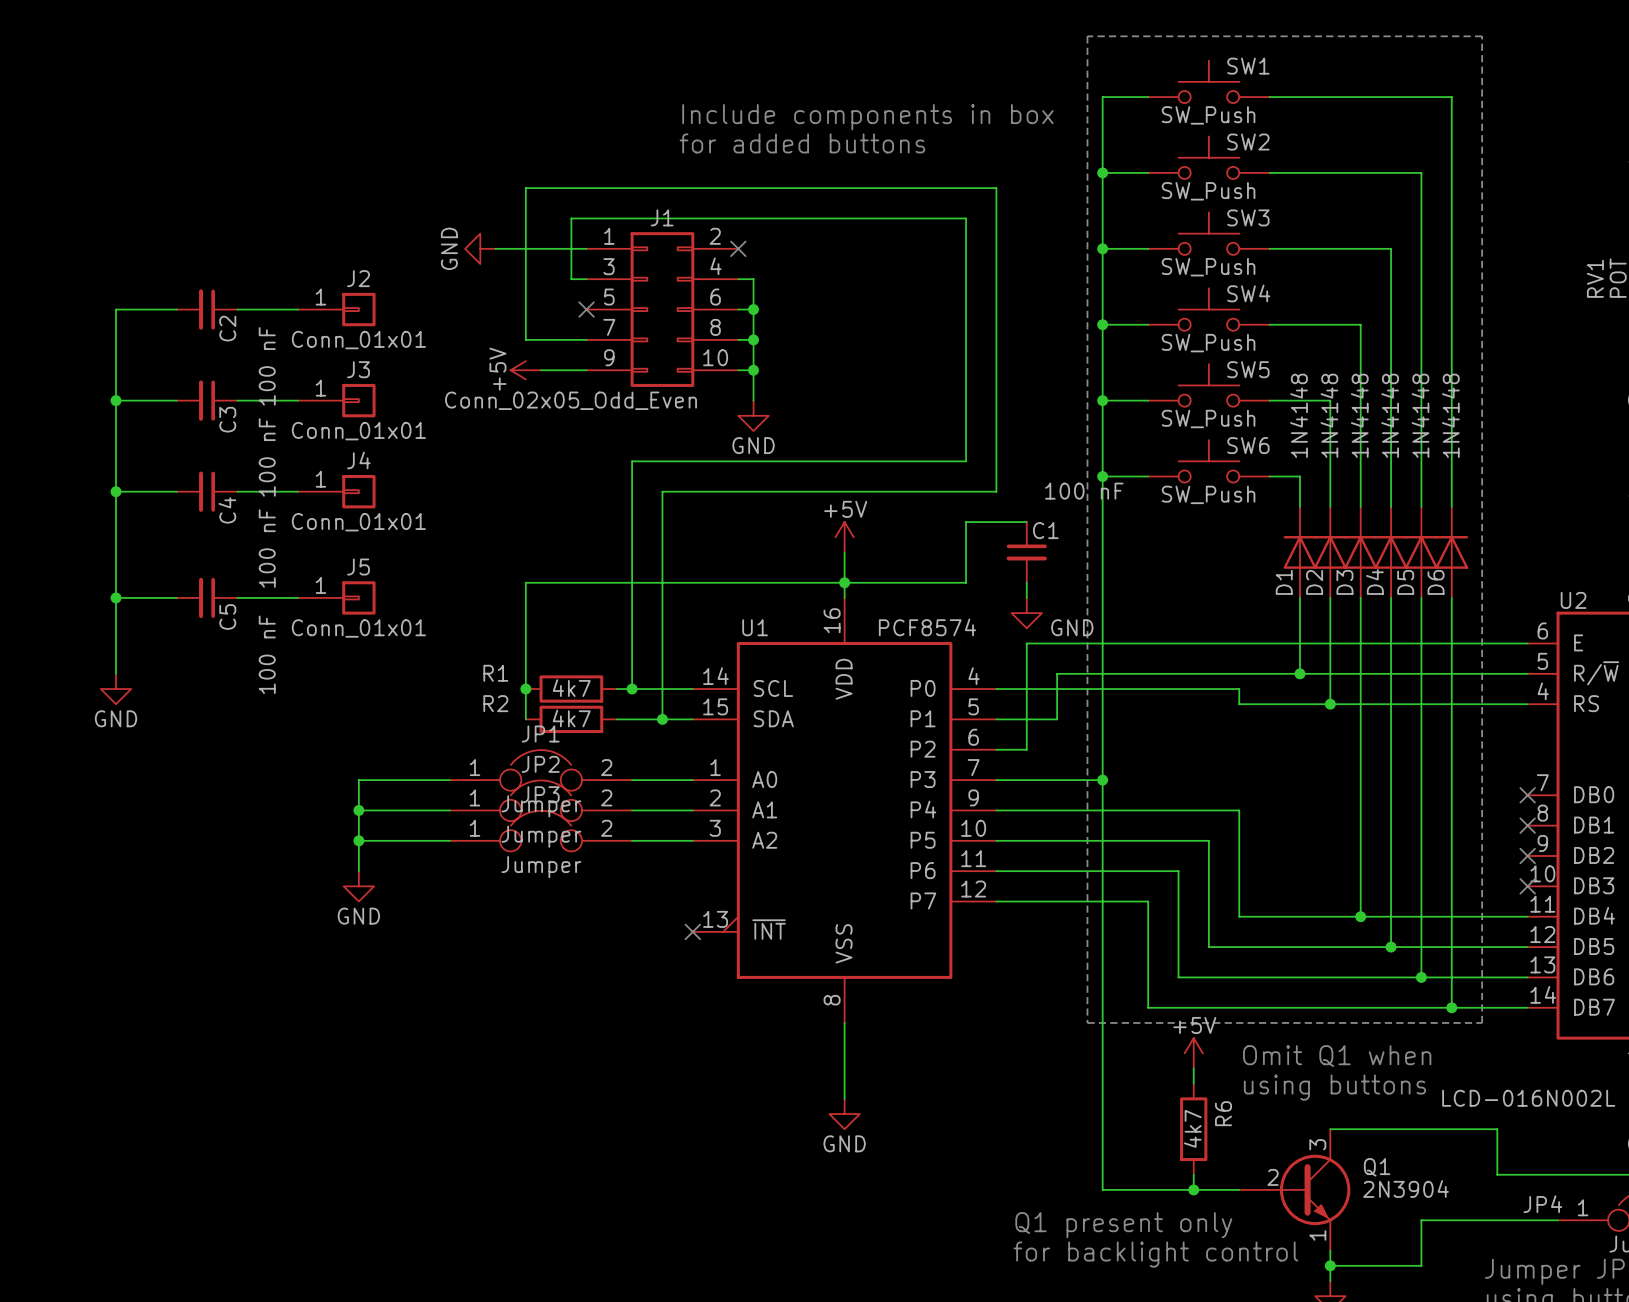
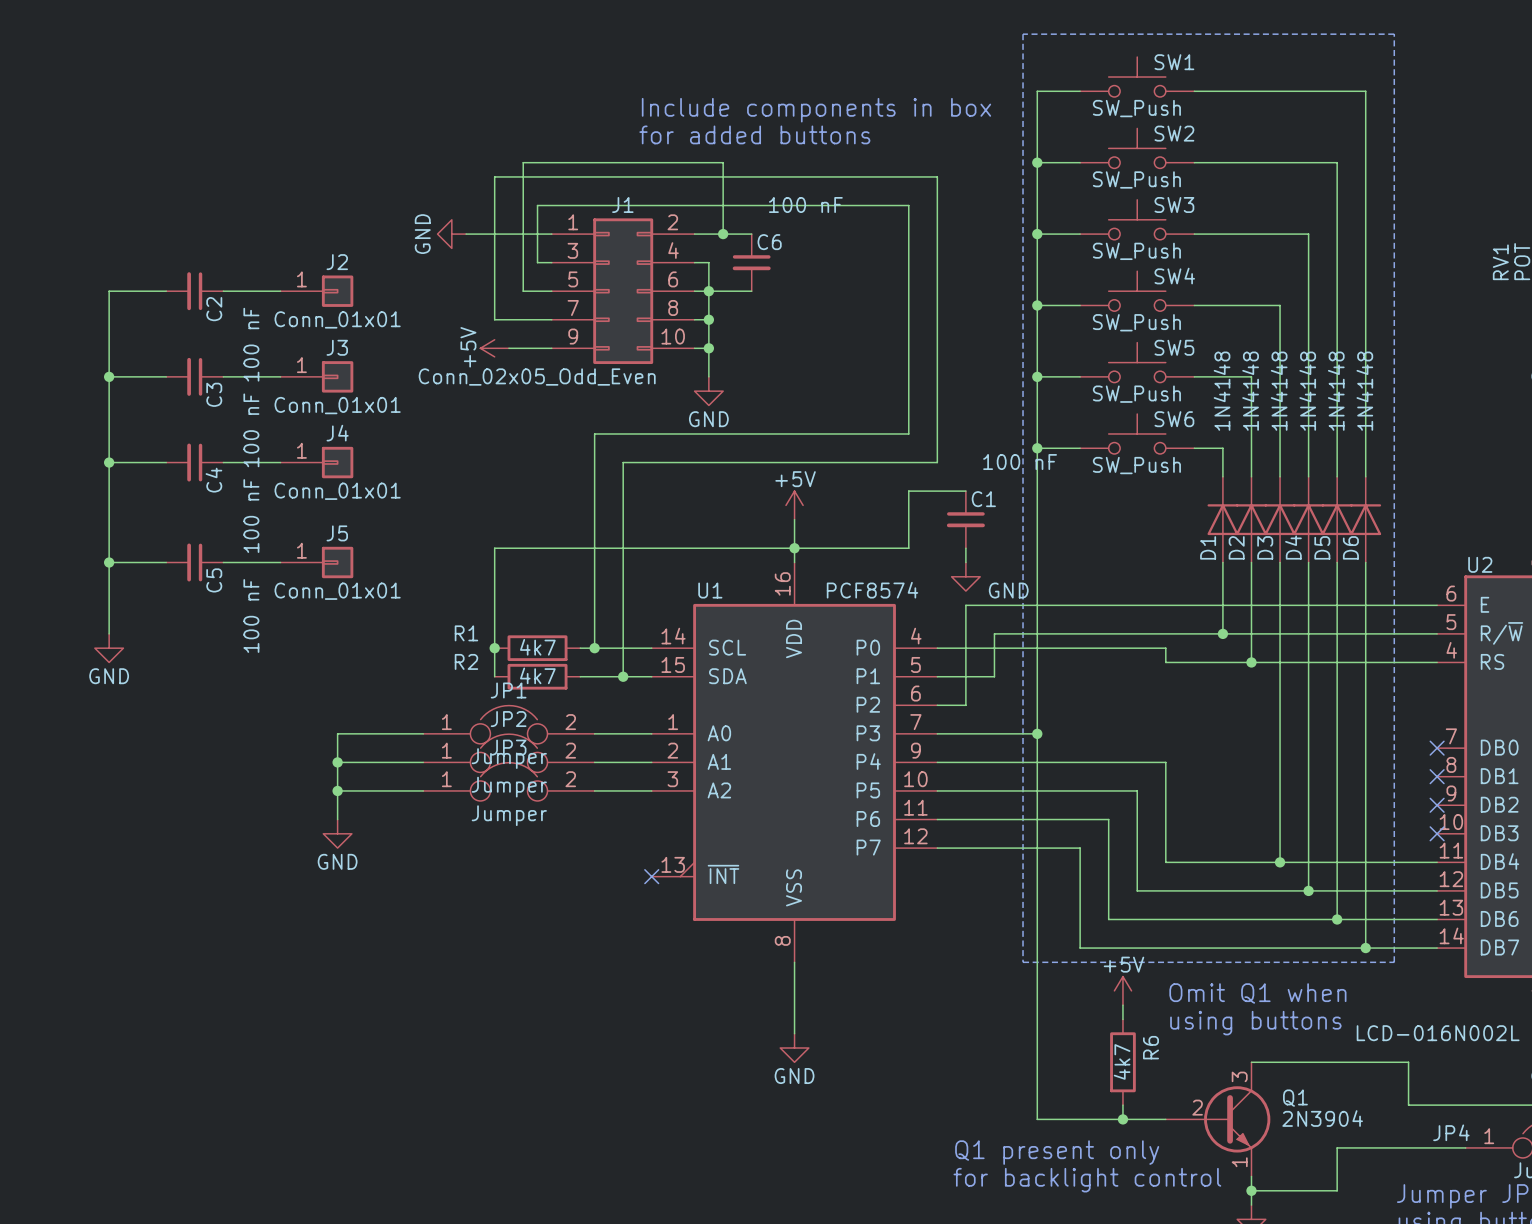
wire: none -> (694, 234) (751, 234)
no-connect mark: (738, 248) -> none
wire: none -> (723, 234) (723, 162) (523, 162) (523, 291) (551, 291)
junction: none -> (723, 234)
C6: none -> 100 nF (751, 262)
no-connect mark: (586, 309) -> none
wire: none -> (708, 291) (751, 291)

